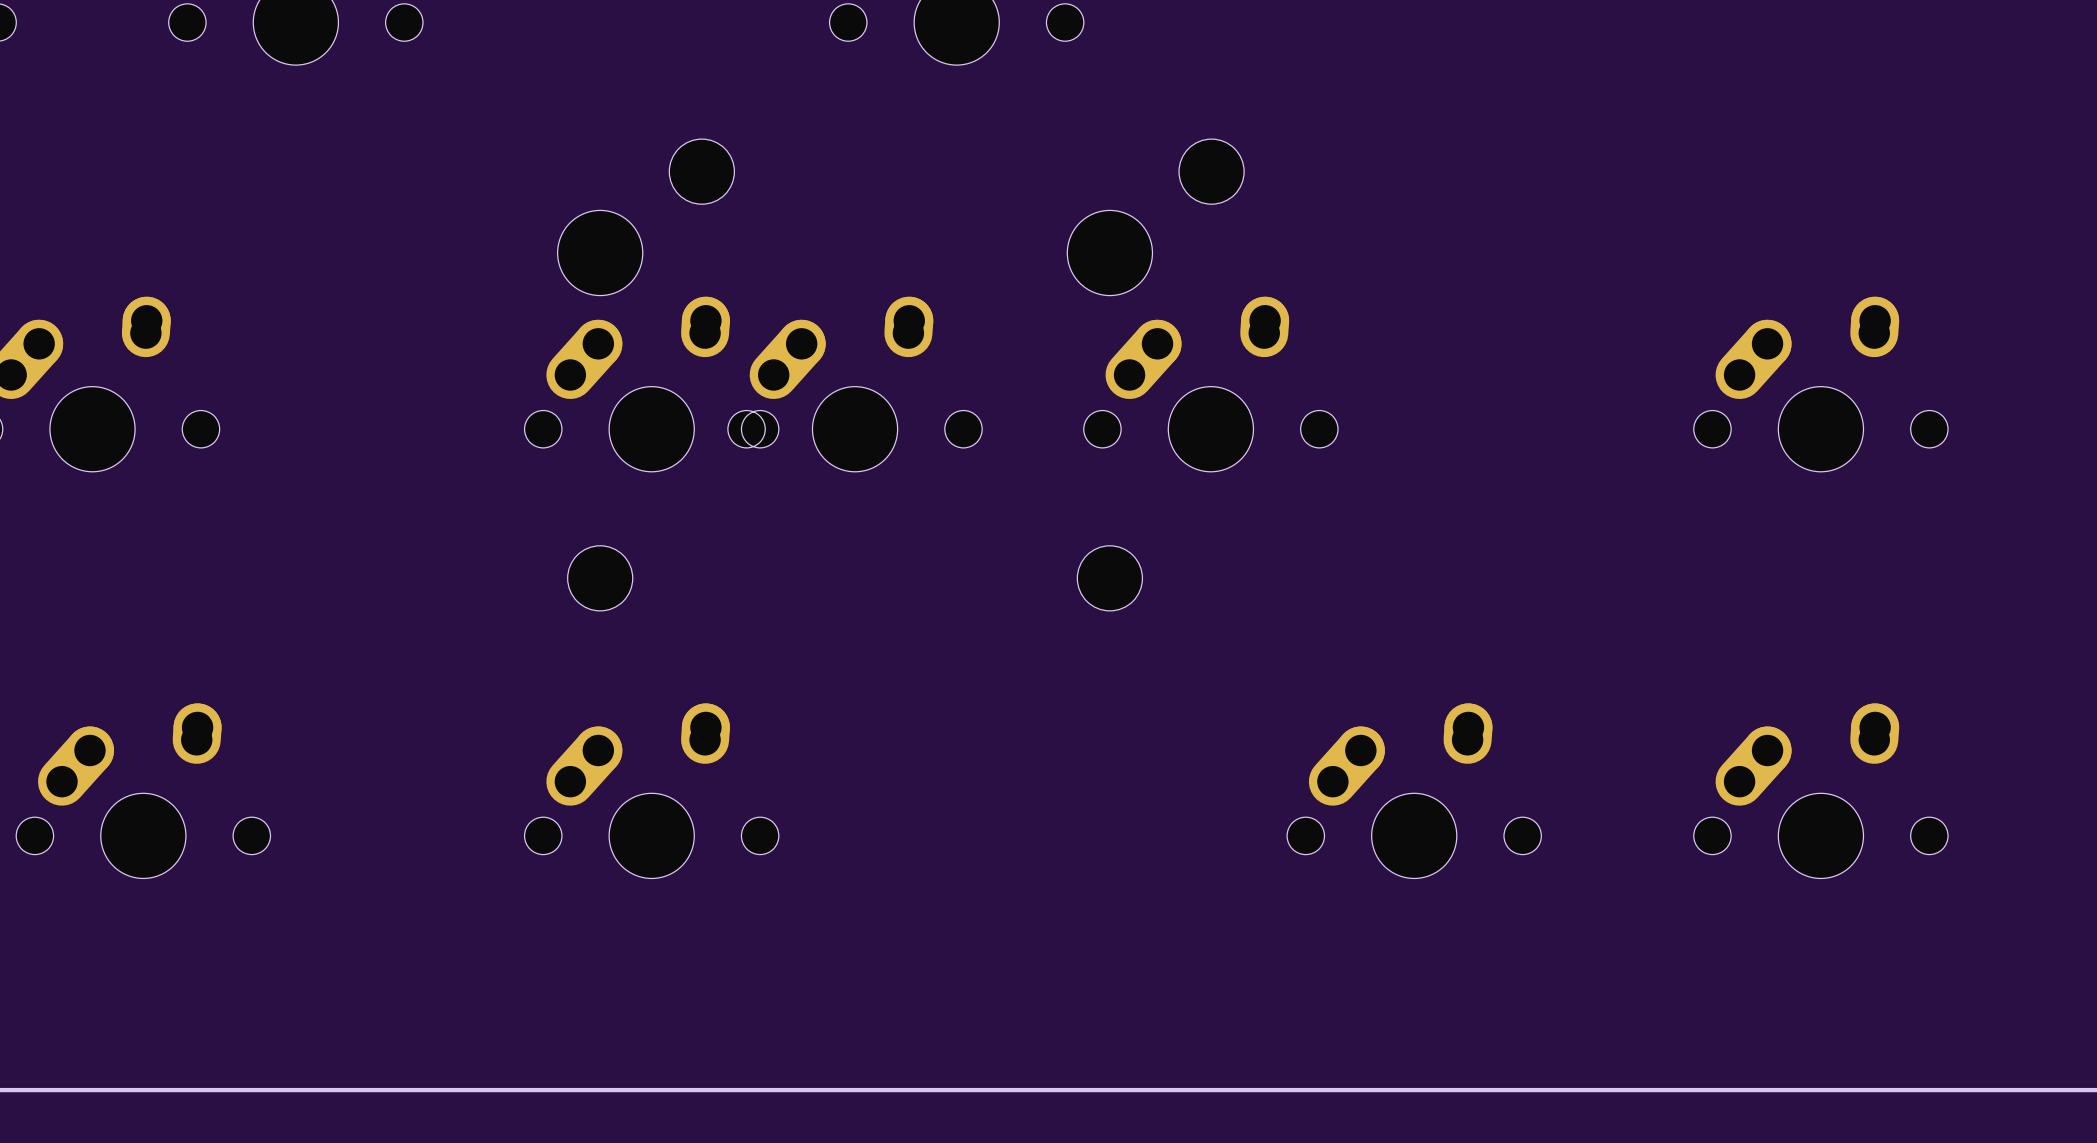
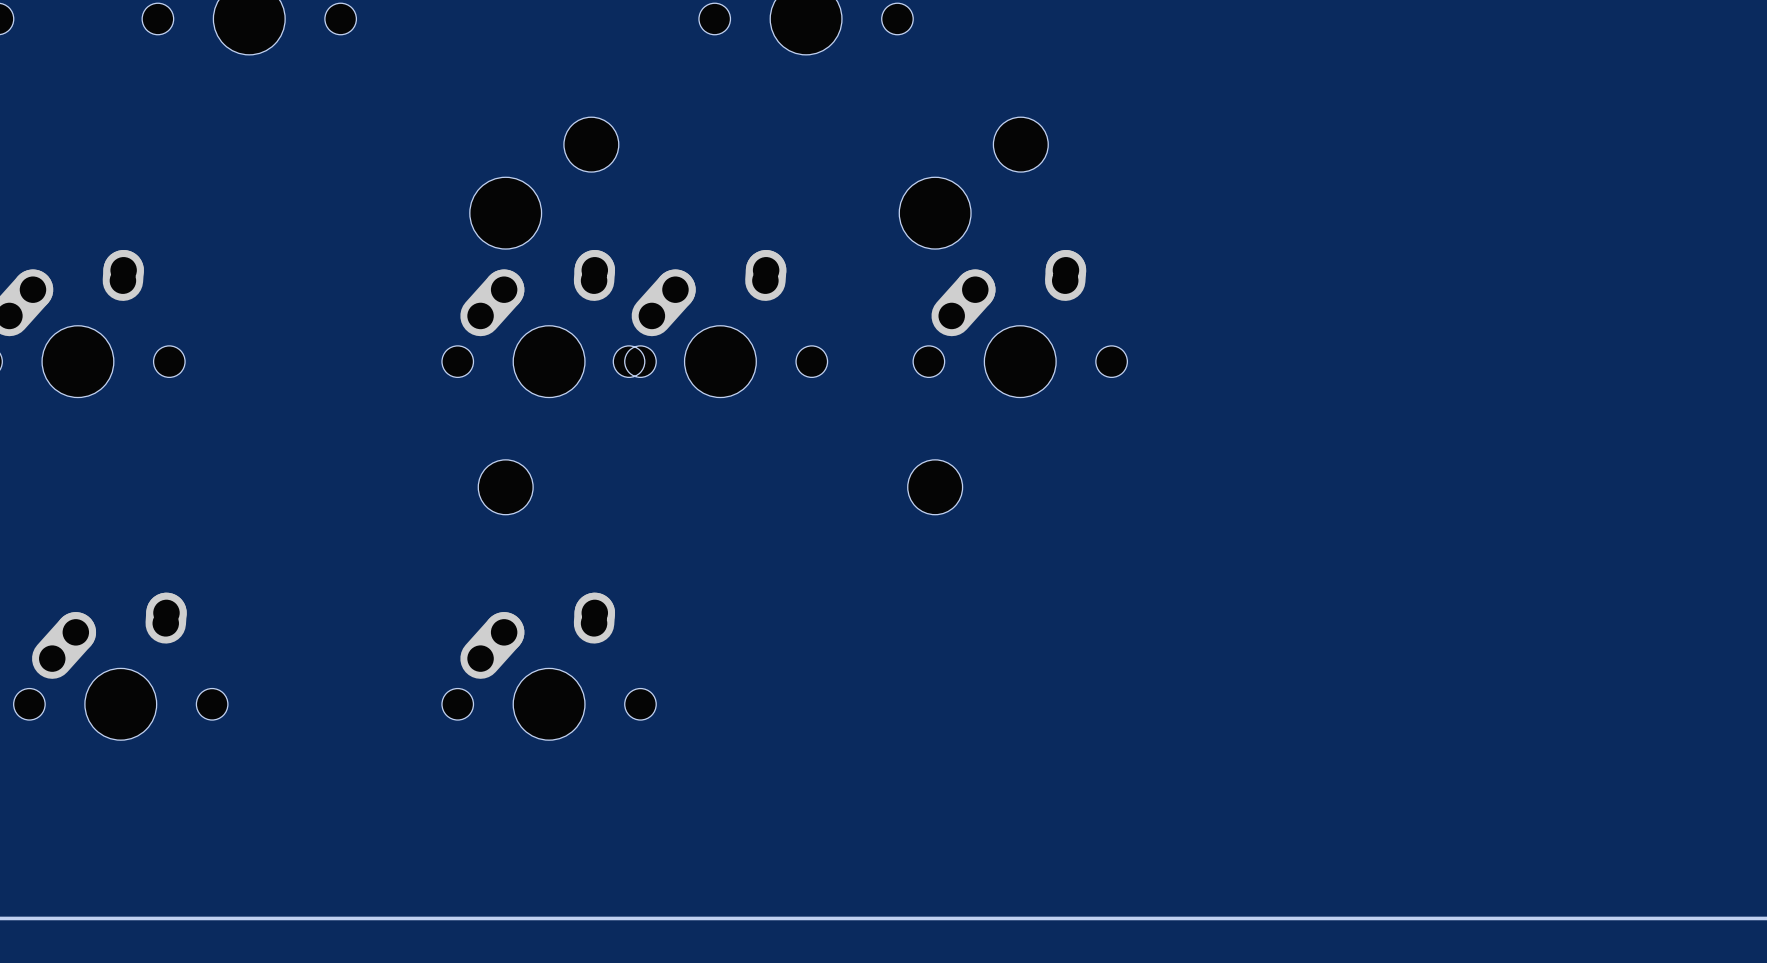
part: (1820, 384) -> none
part: (1414, 790) -> none
part: (1820, 790) -> none

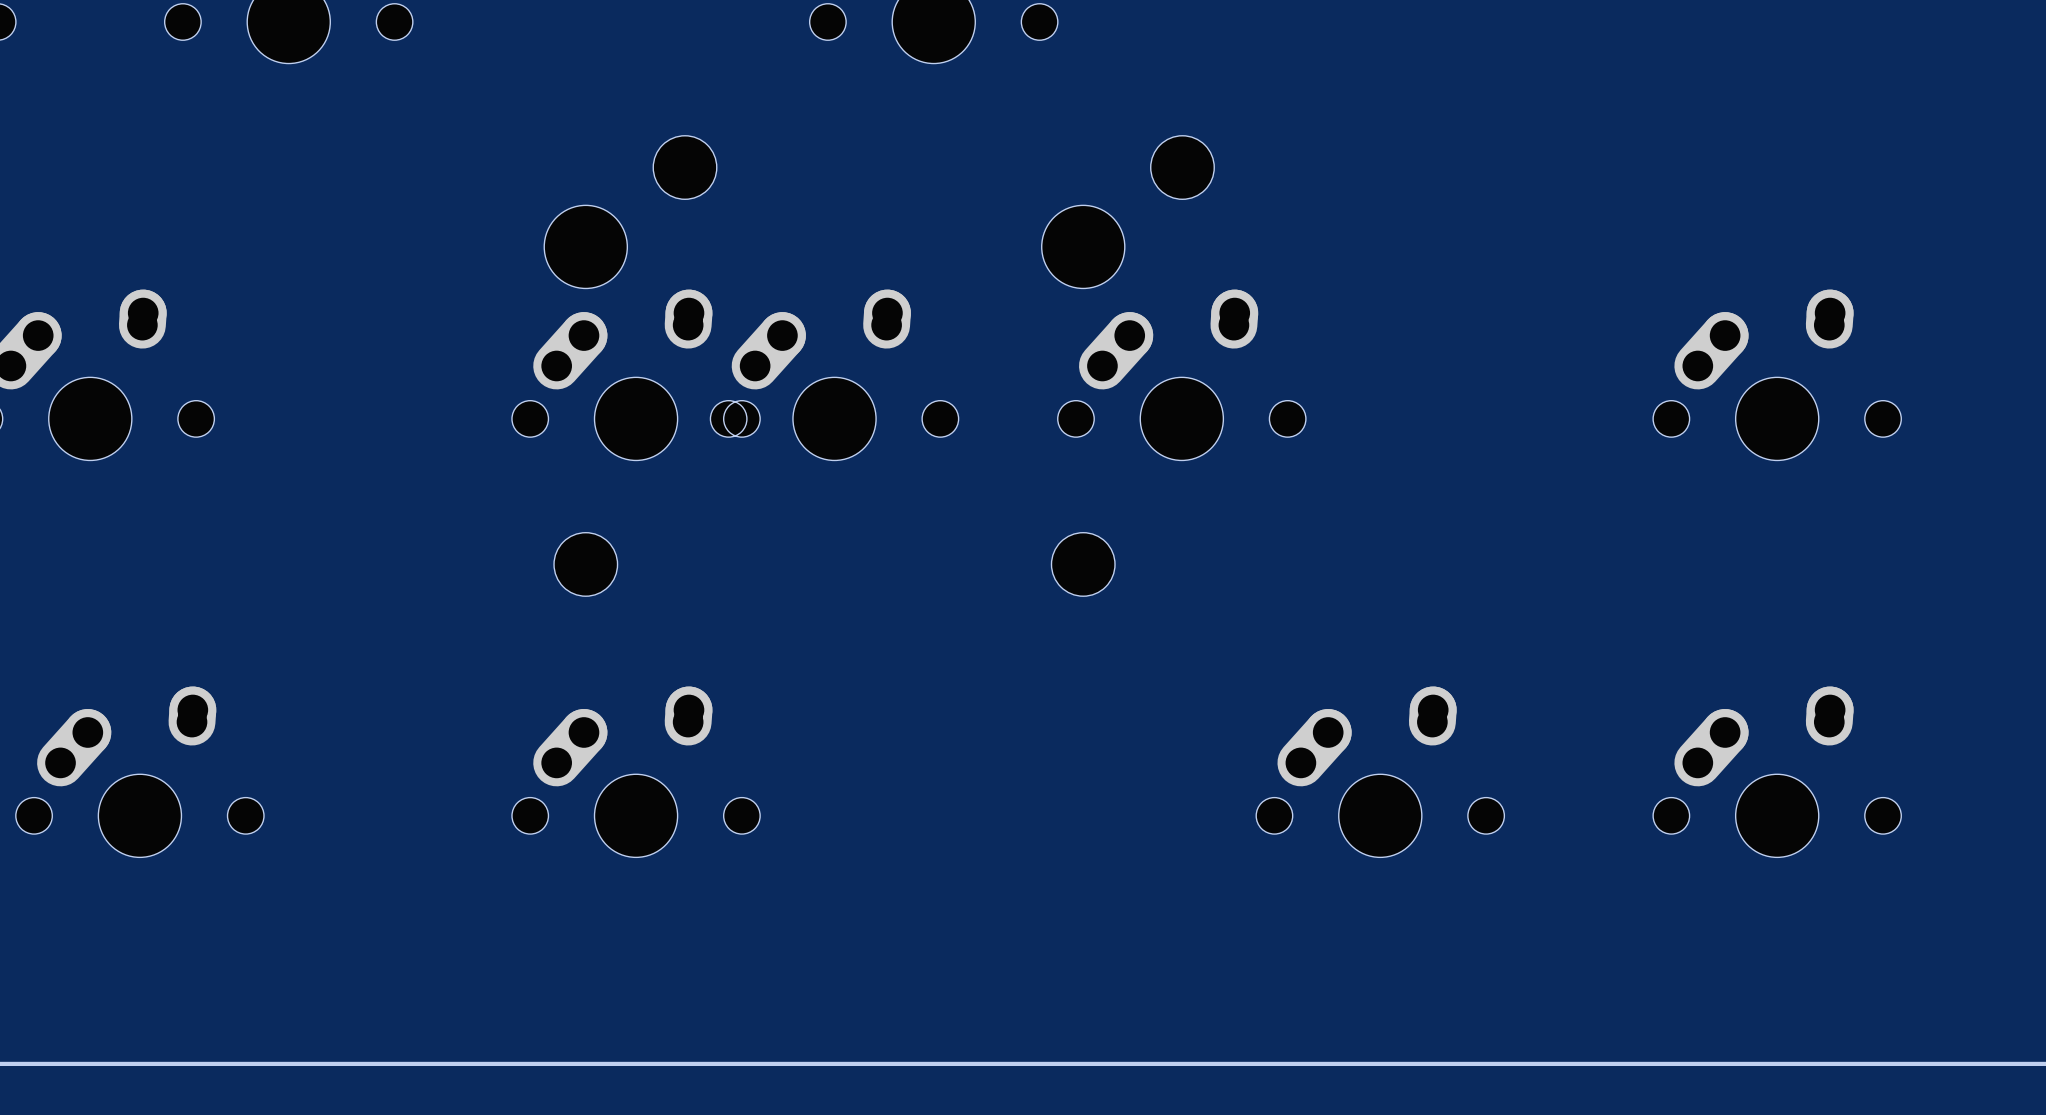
part: none -> (1777, 375)
part: none -> (1380, 771)
part: none -> (1777, 771)

